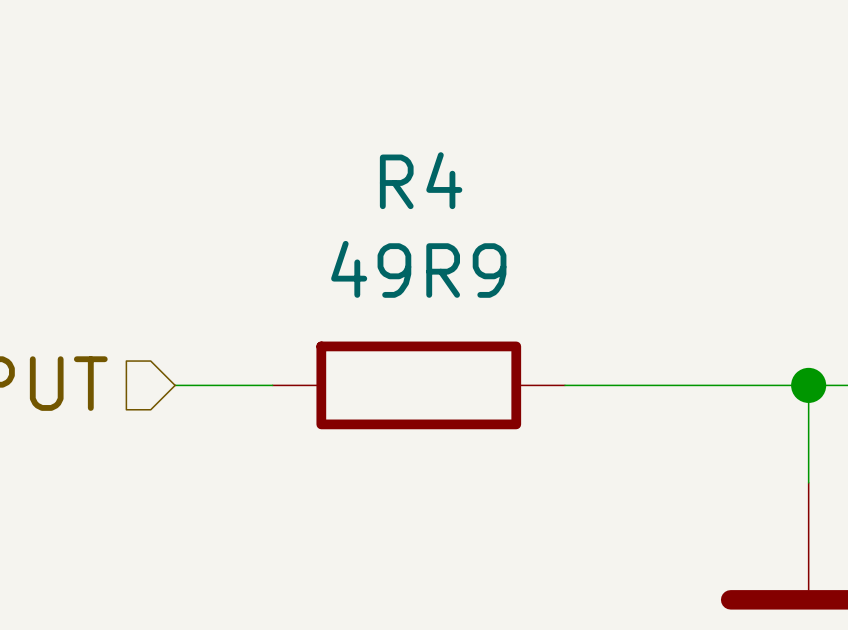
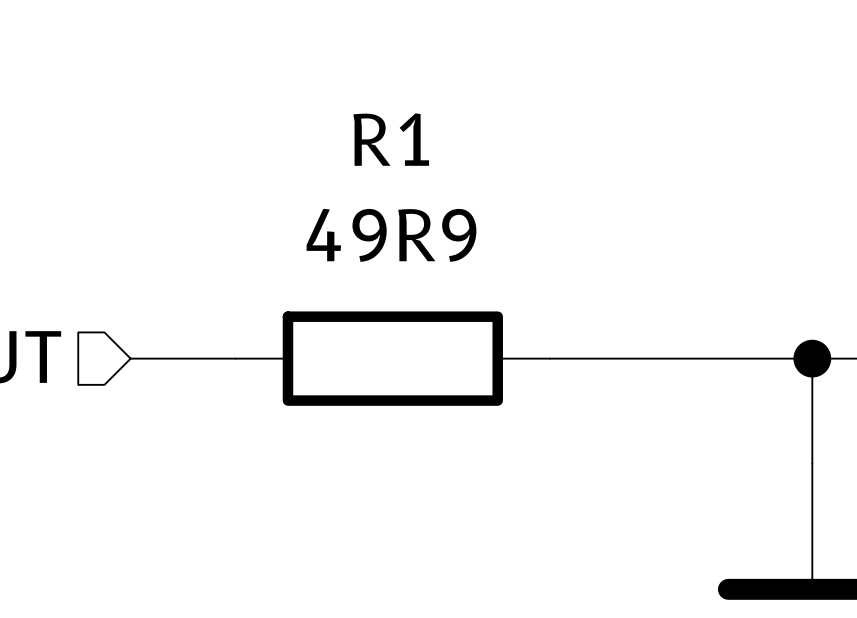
R4 name: R4 (421, 180) -> R1 (391, 139)

